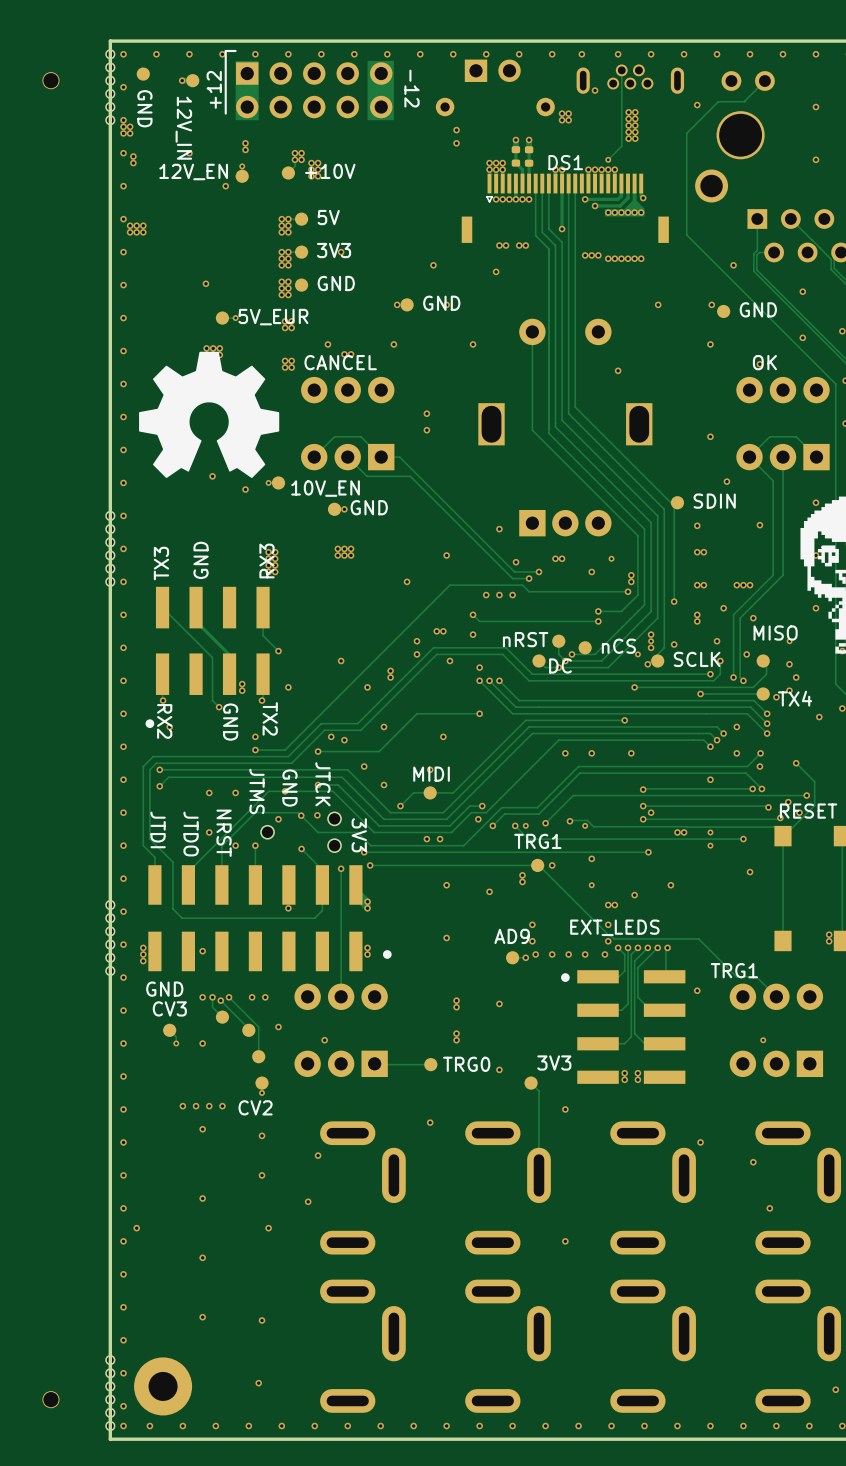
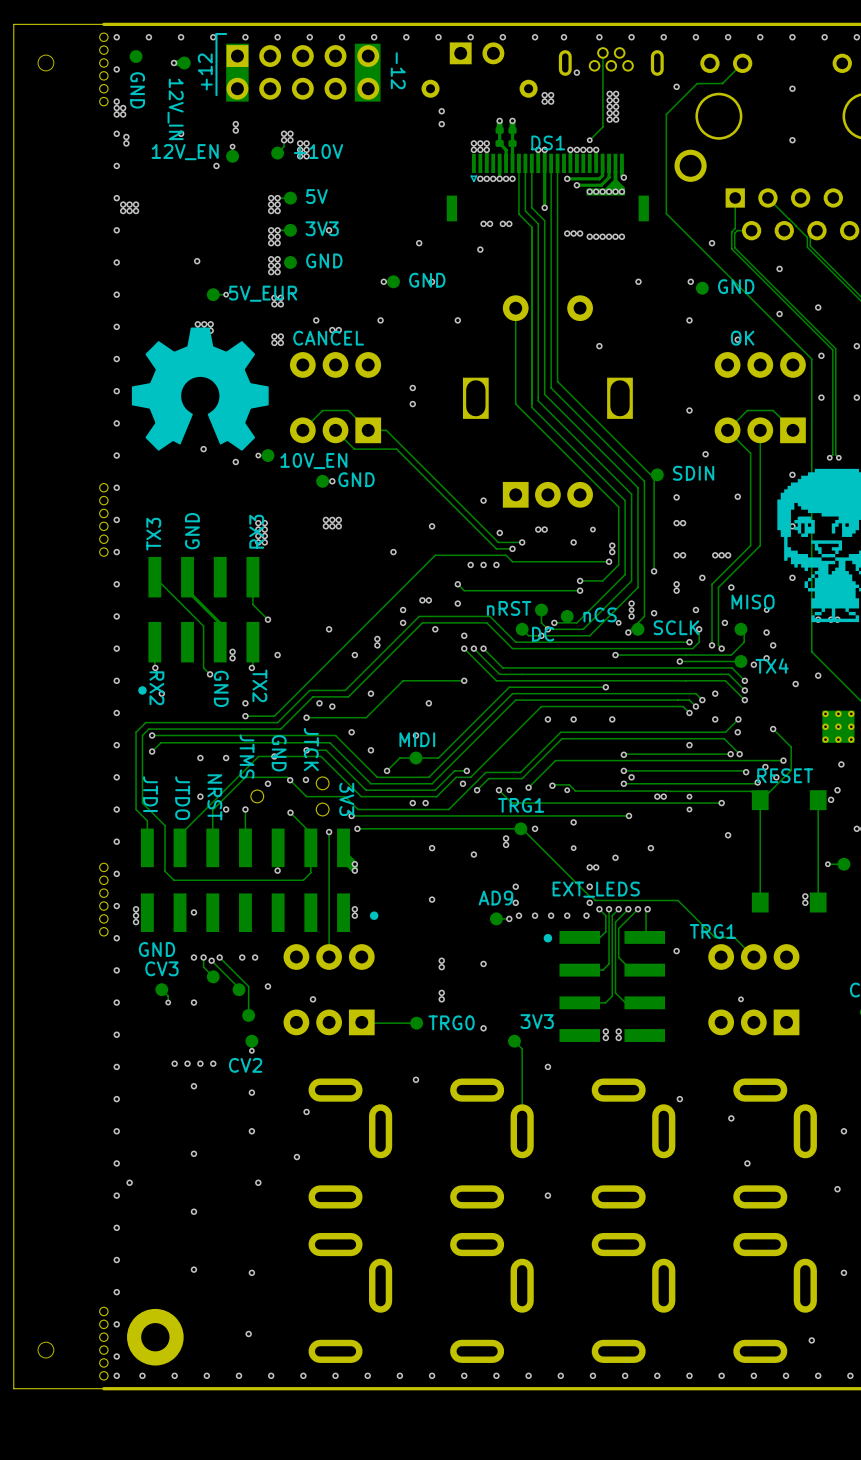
board edge: (110, 41) (110, 1439) -> (103, 24) (13, 24) (13, 1388) (103, 1388)

